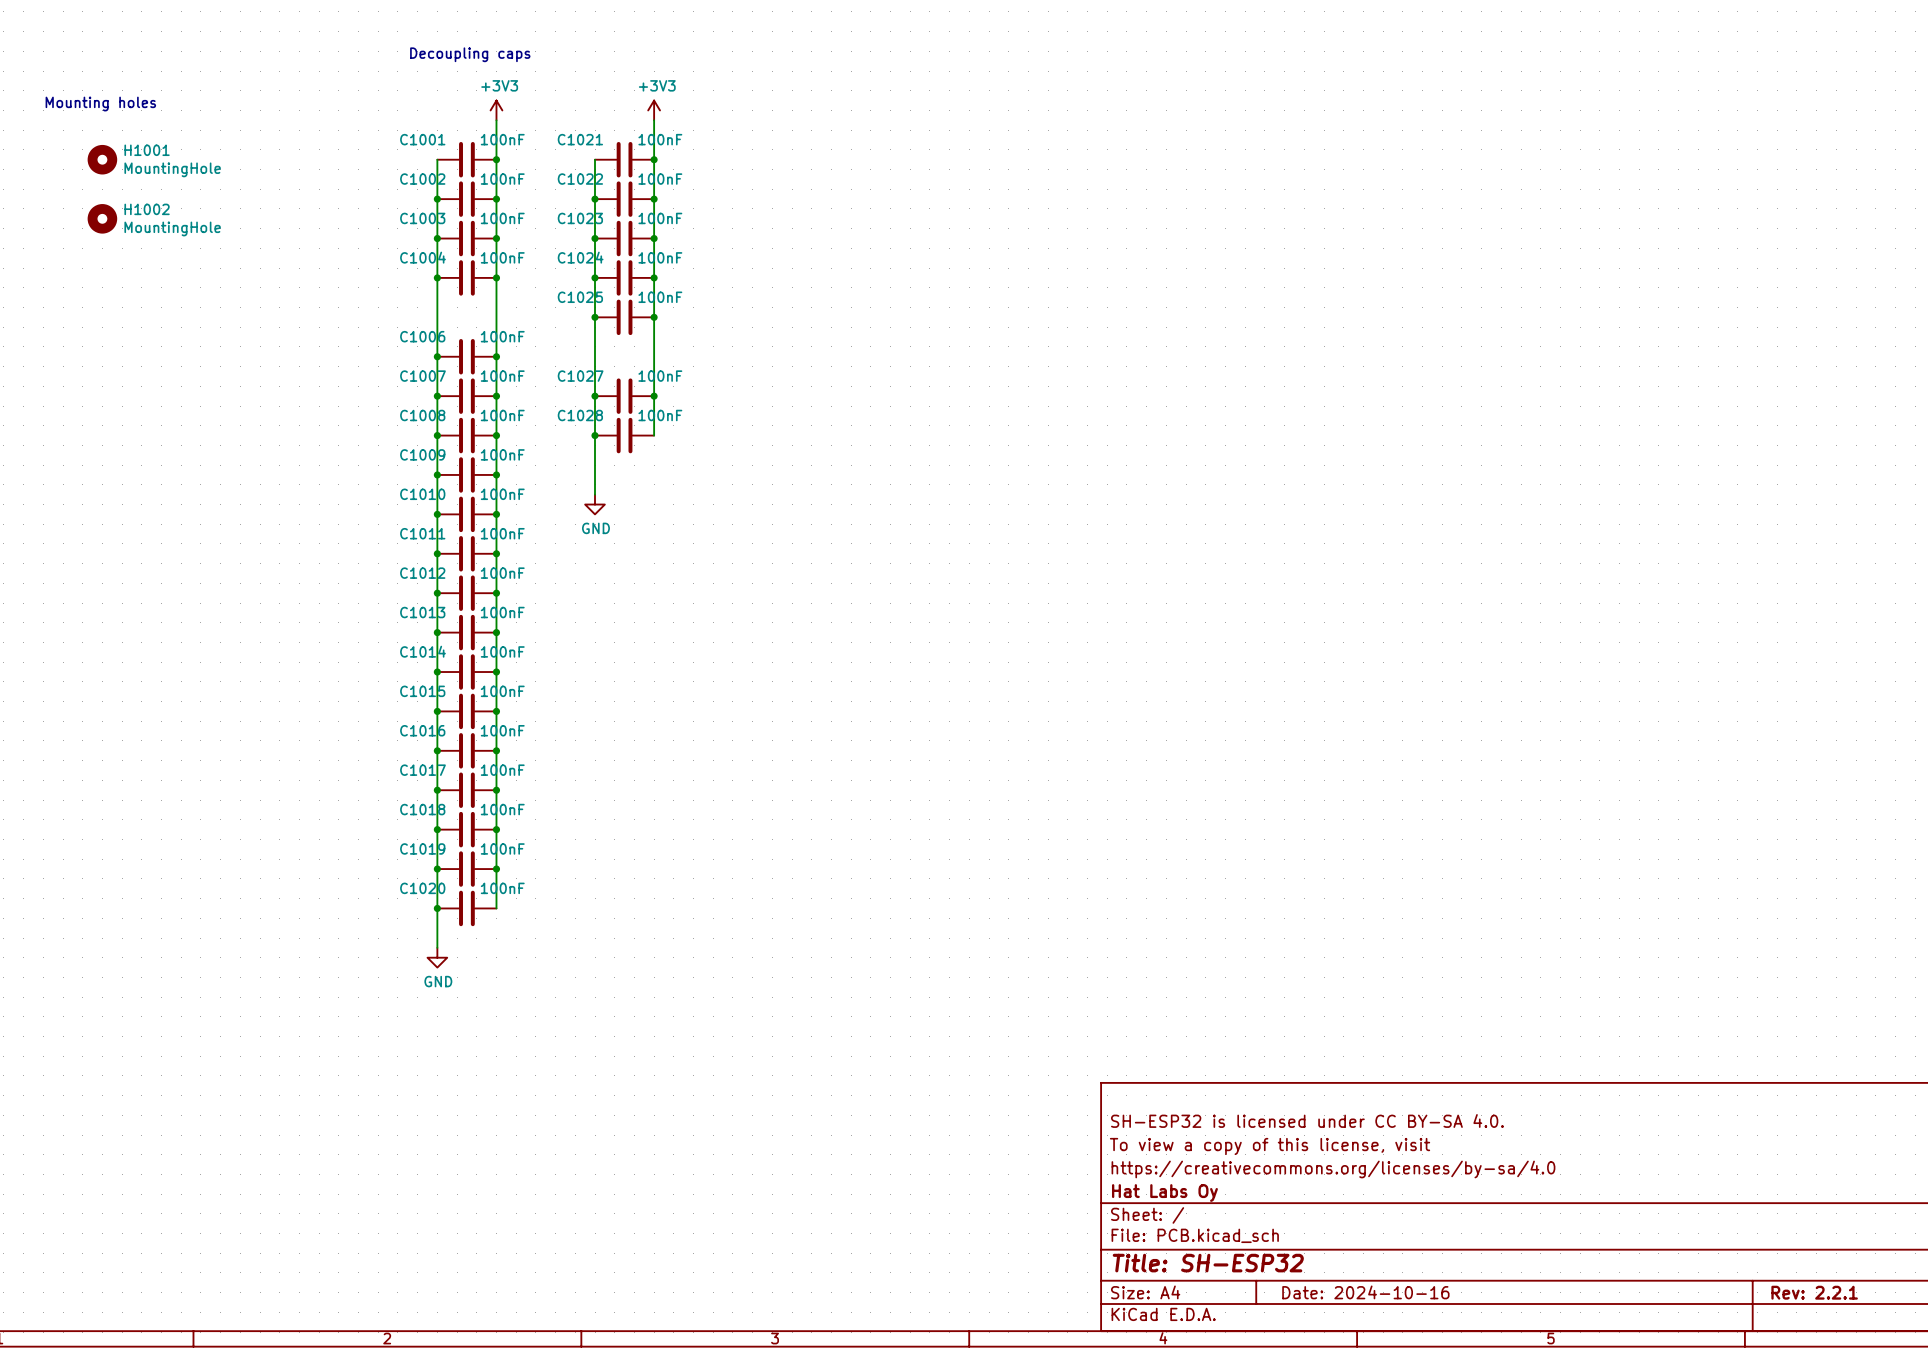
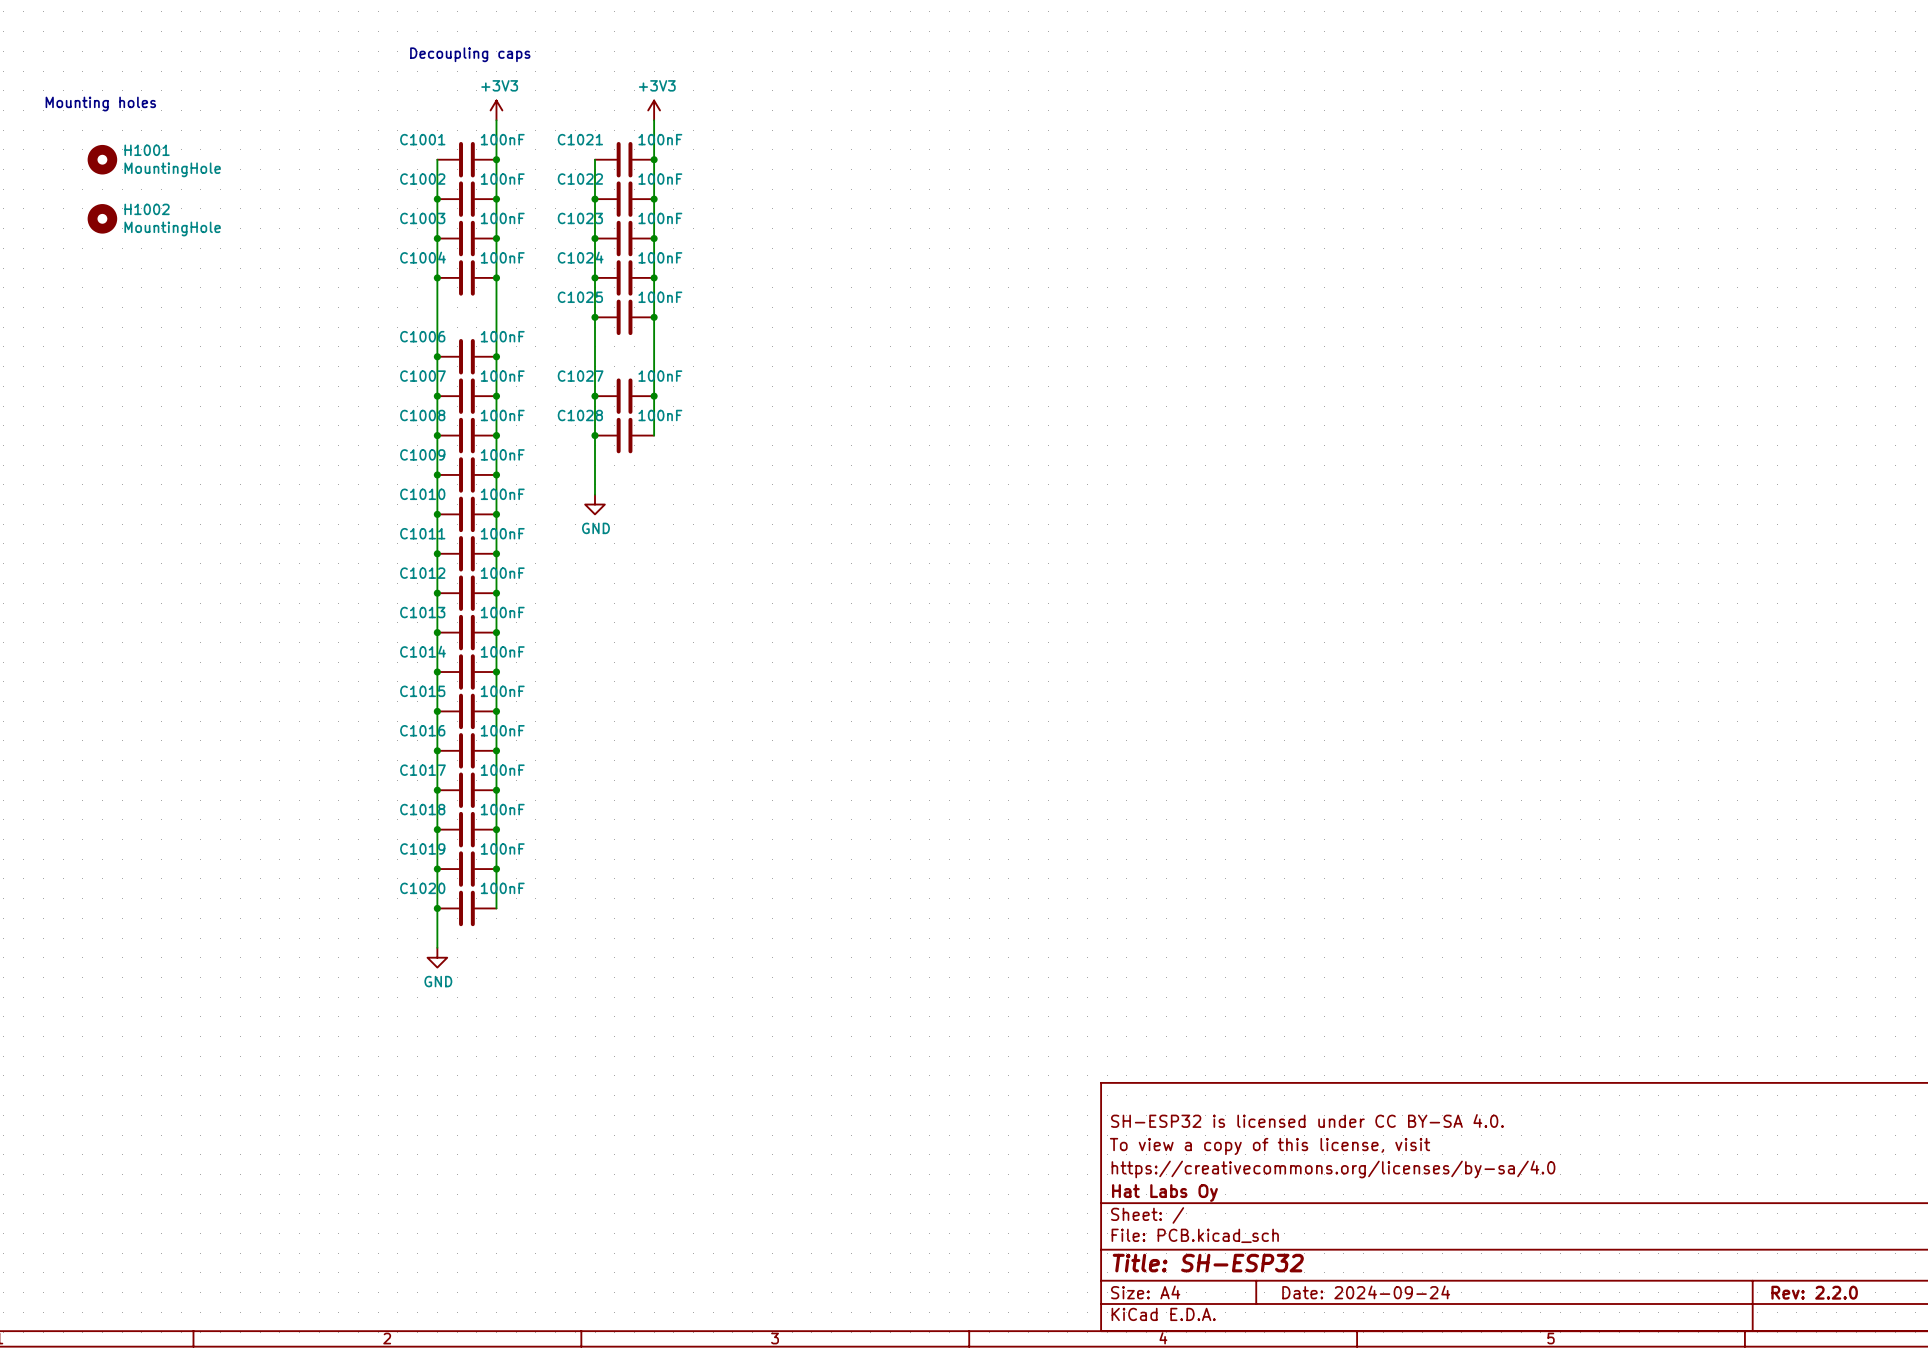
title block: Date: 2024-10-16 (1365, 1292) -> Date: 2024-09-24 (1366, 1292)
title block: Rev: 2.2.1 (1814, 1292) -> Rev: 2.2.0 (1814, 1292)

